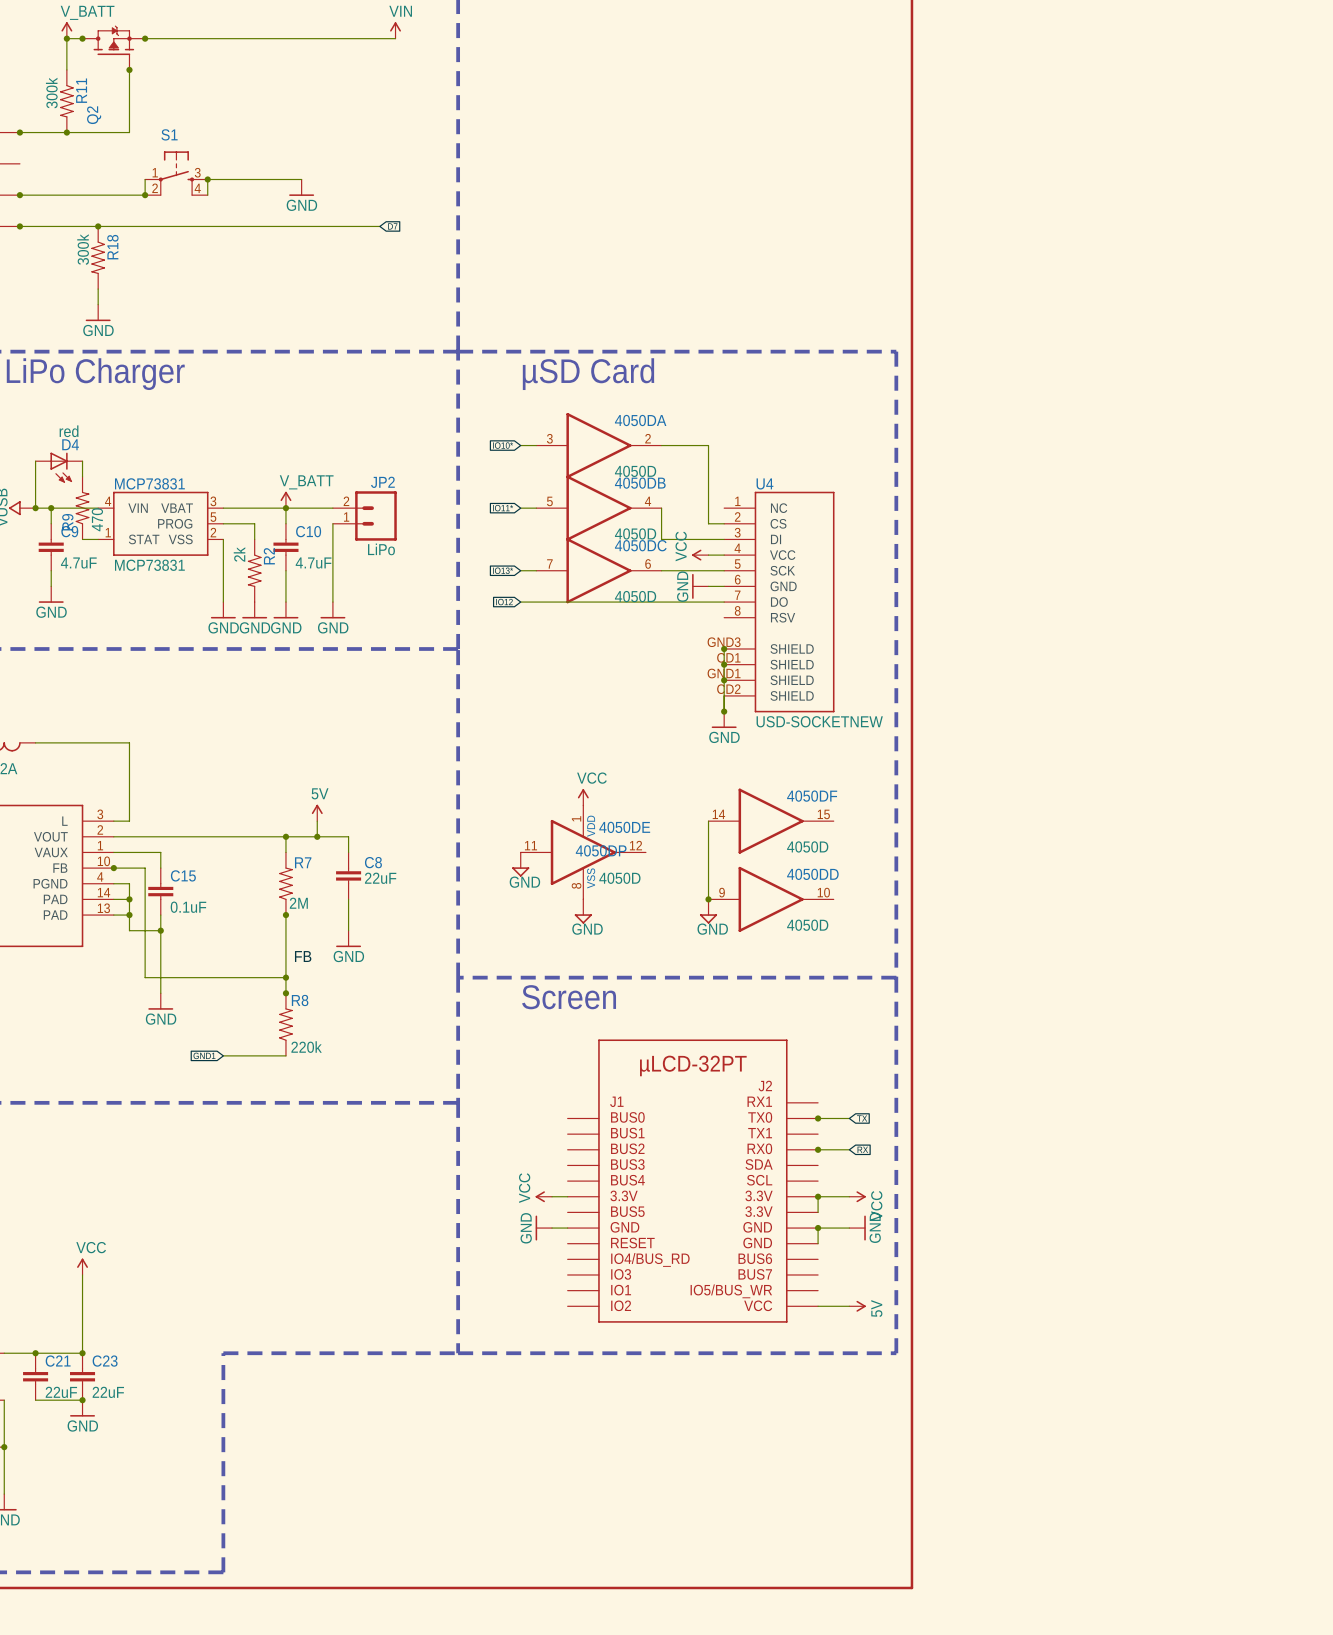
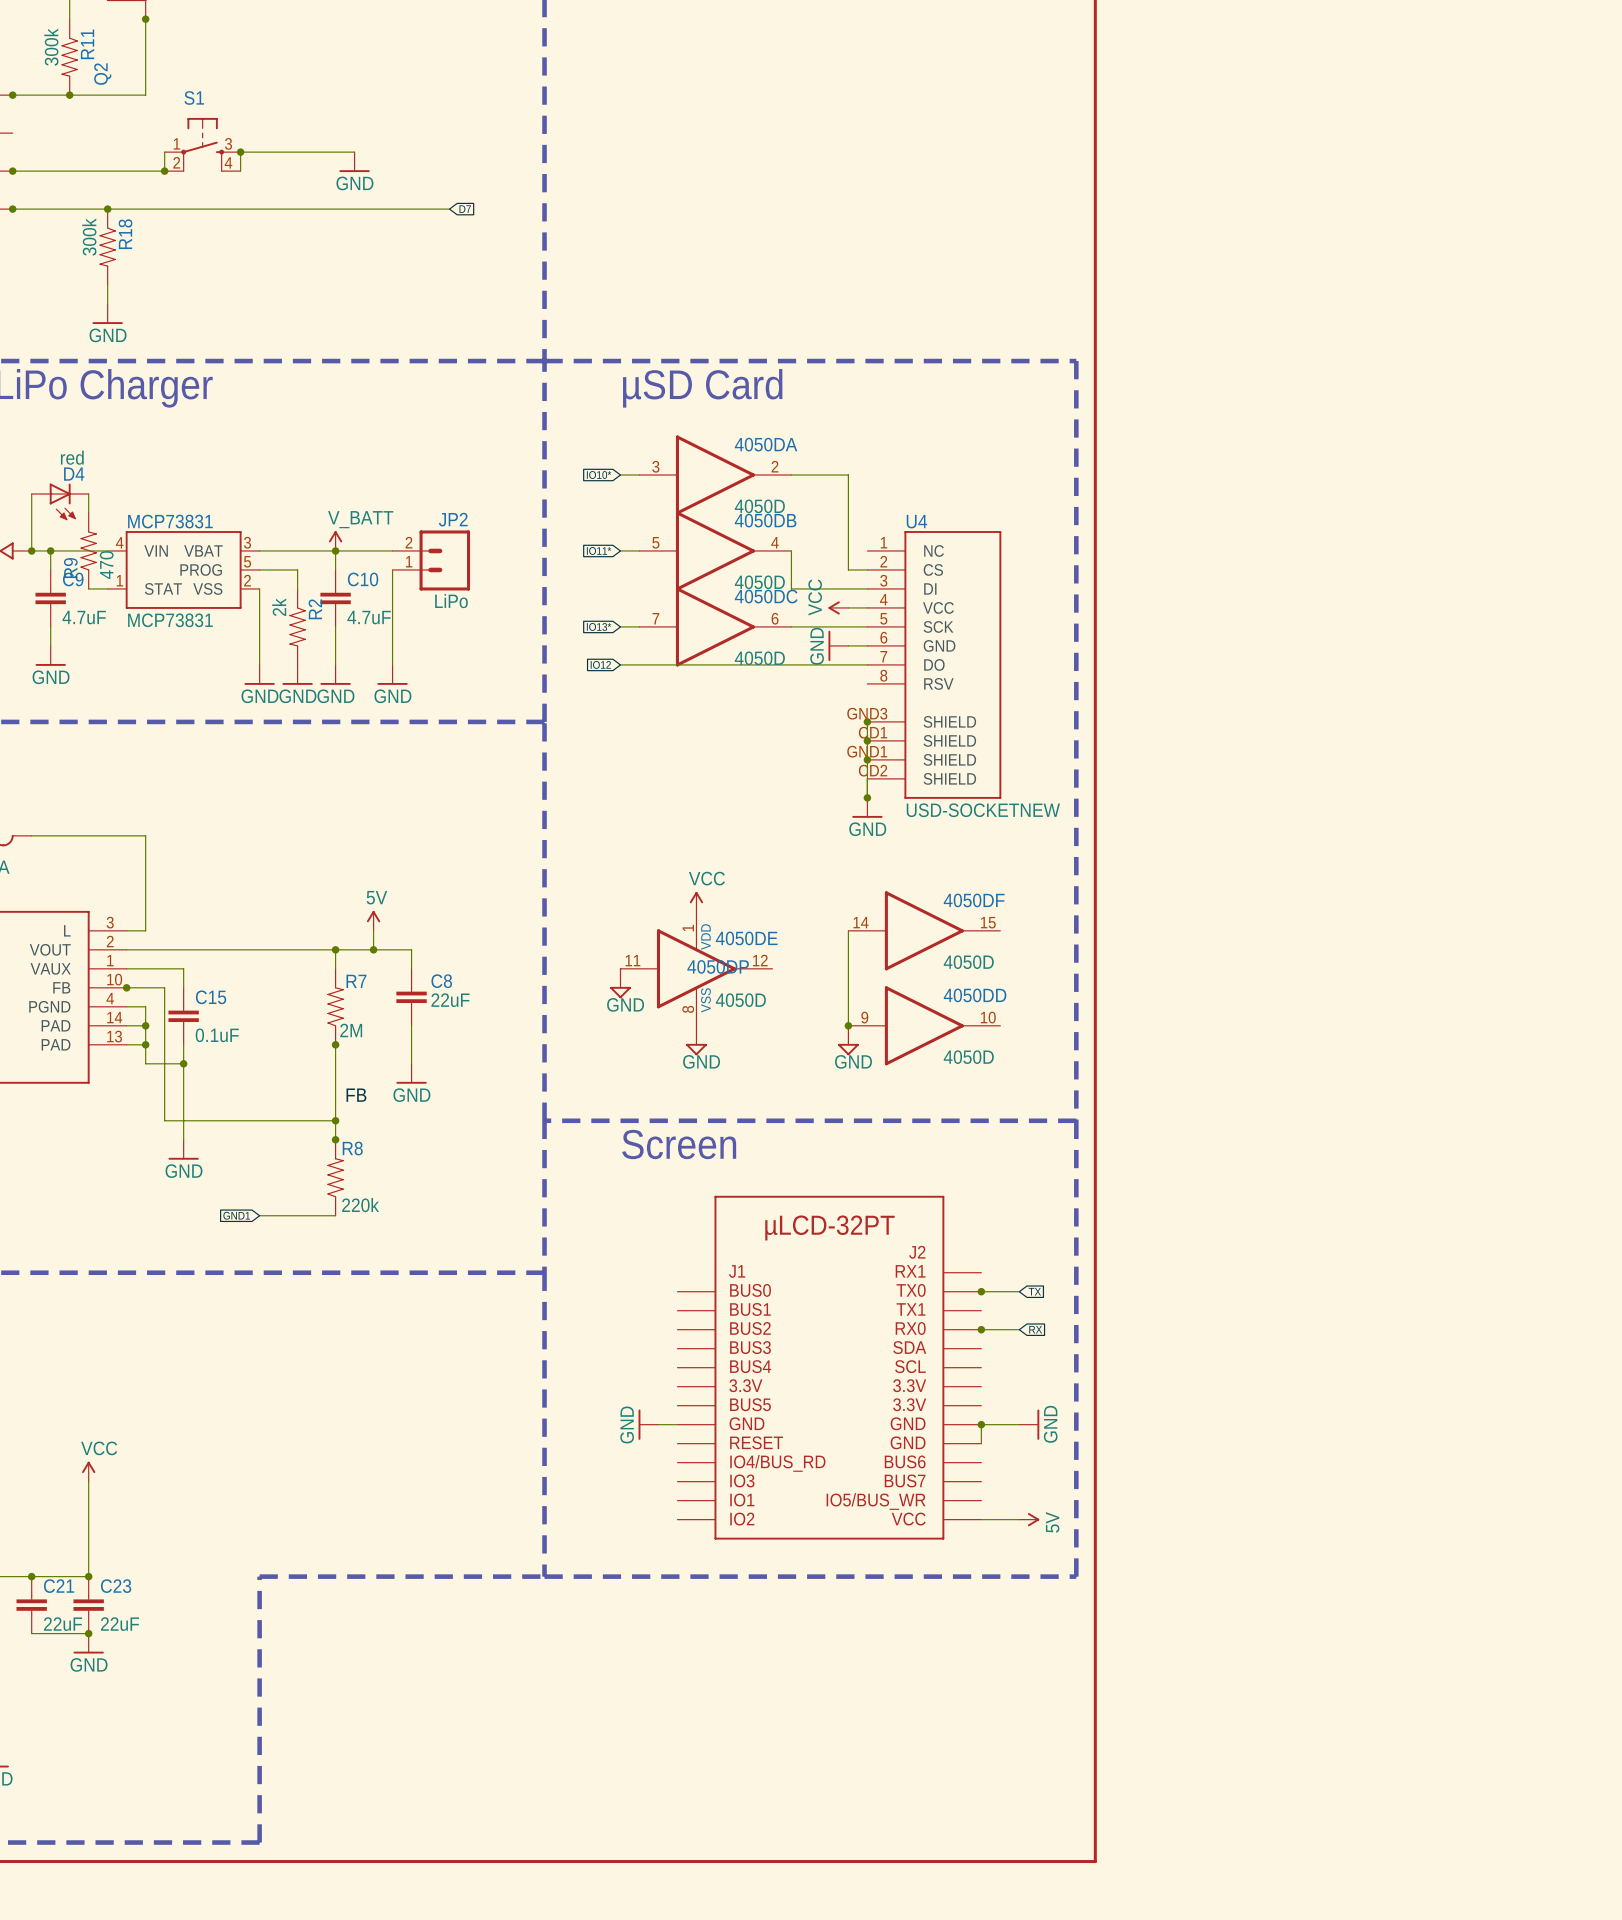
power symbol: VCC (543, 1196) -> none
wire: (552, 1196) (567, 1196) -> none
junction: (818, 1196) -> none
wire: (849, 1196) (818, 1196) (818, 1212) -> none
power symbol: VCC (857, 1196) -> none

